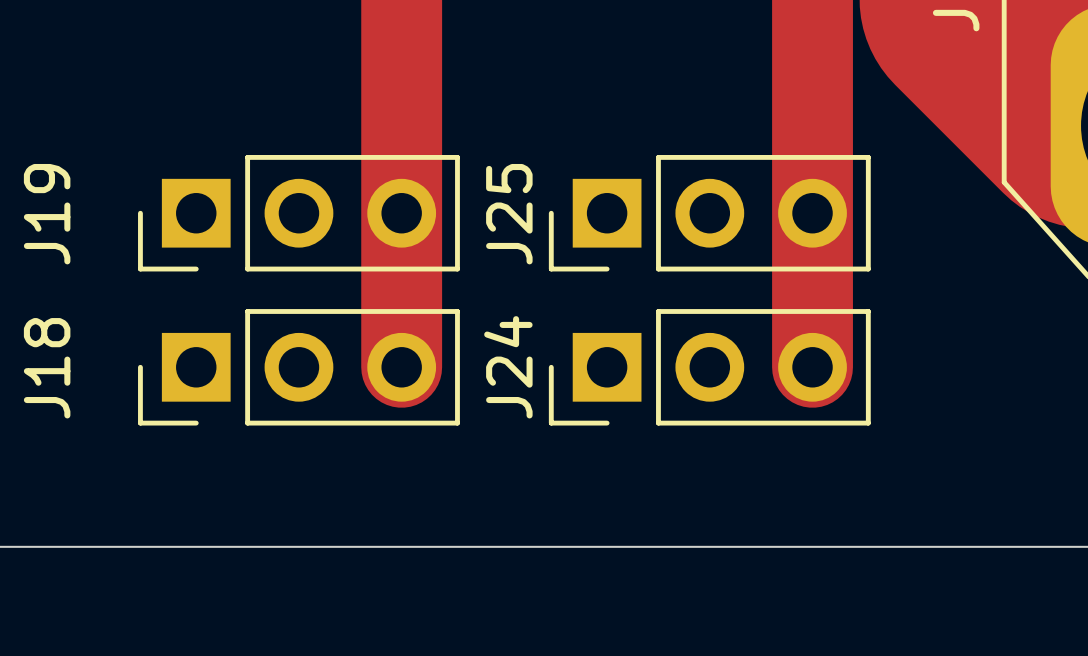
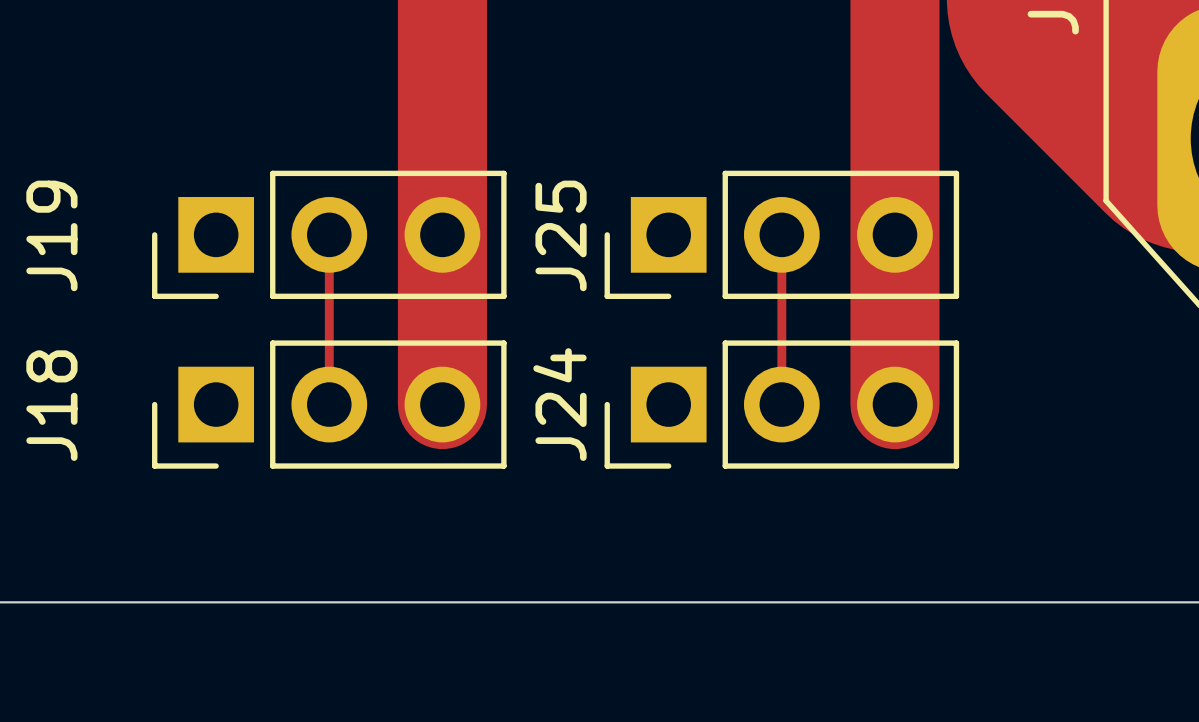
track: none -> (329, 234) (329, 404)
track: none -> (781, 234) (781, 404)

